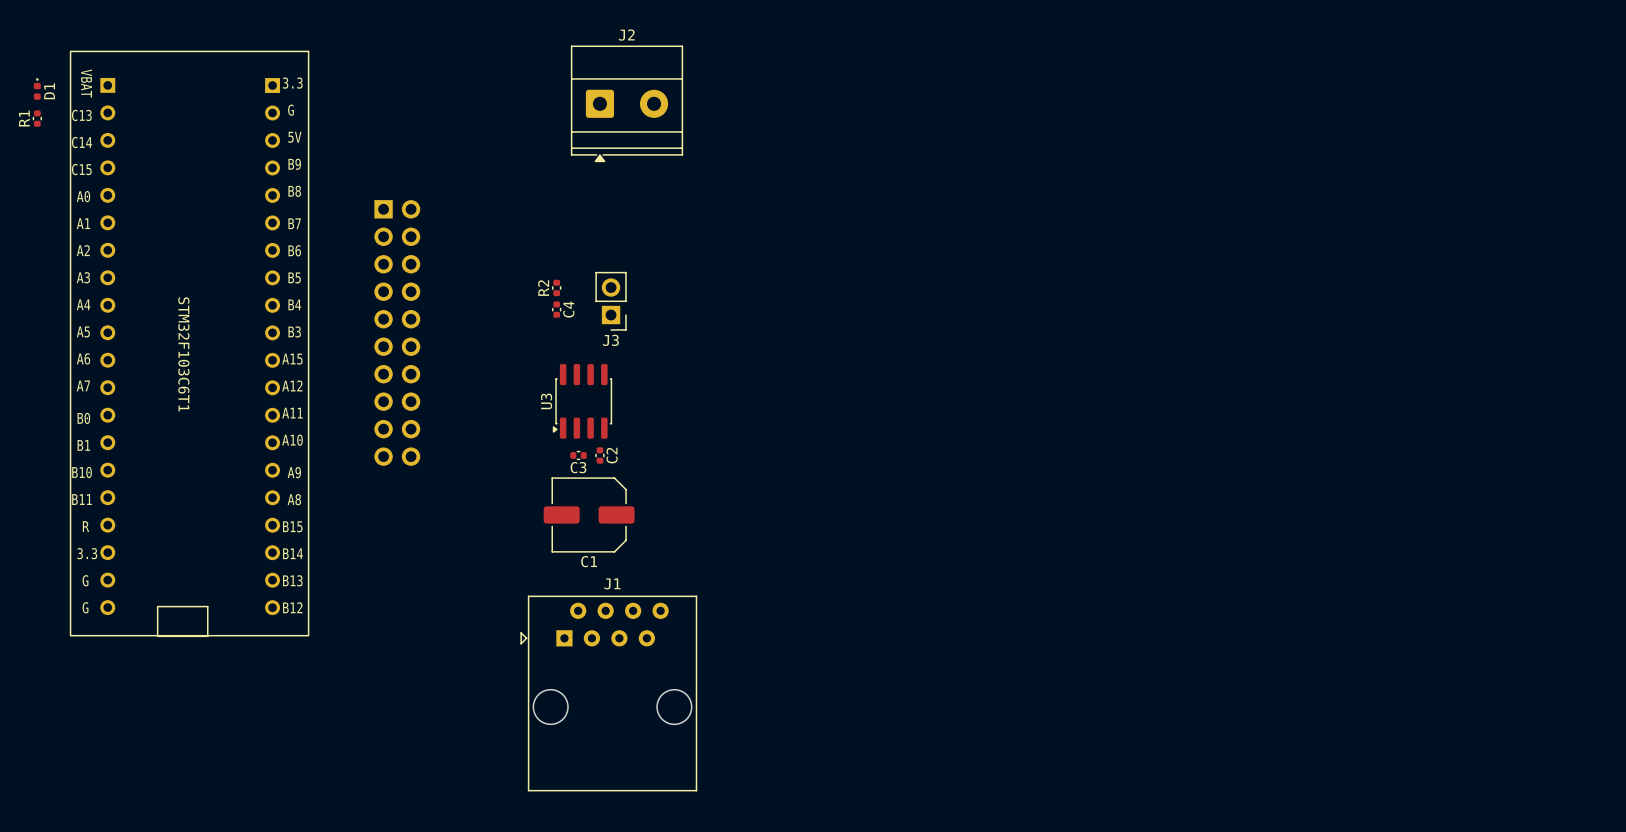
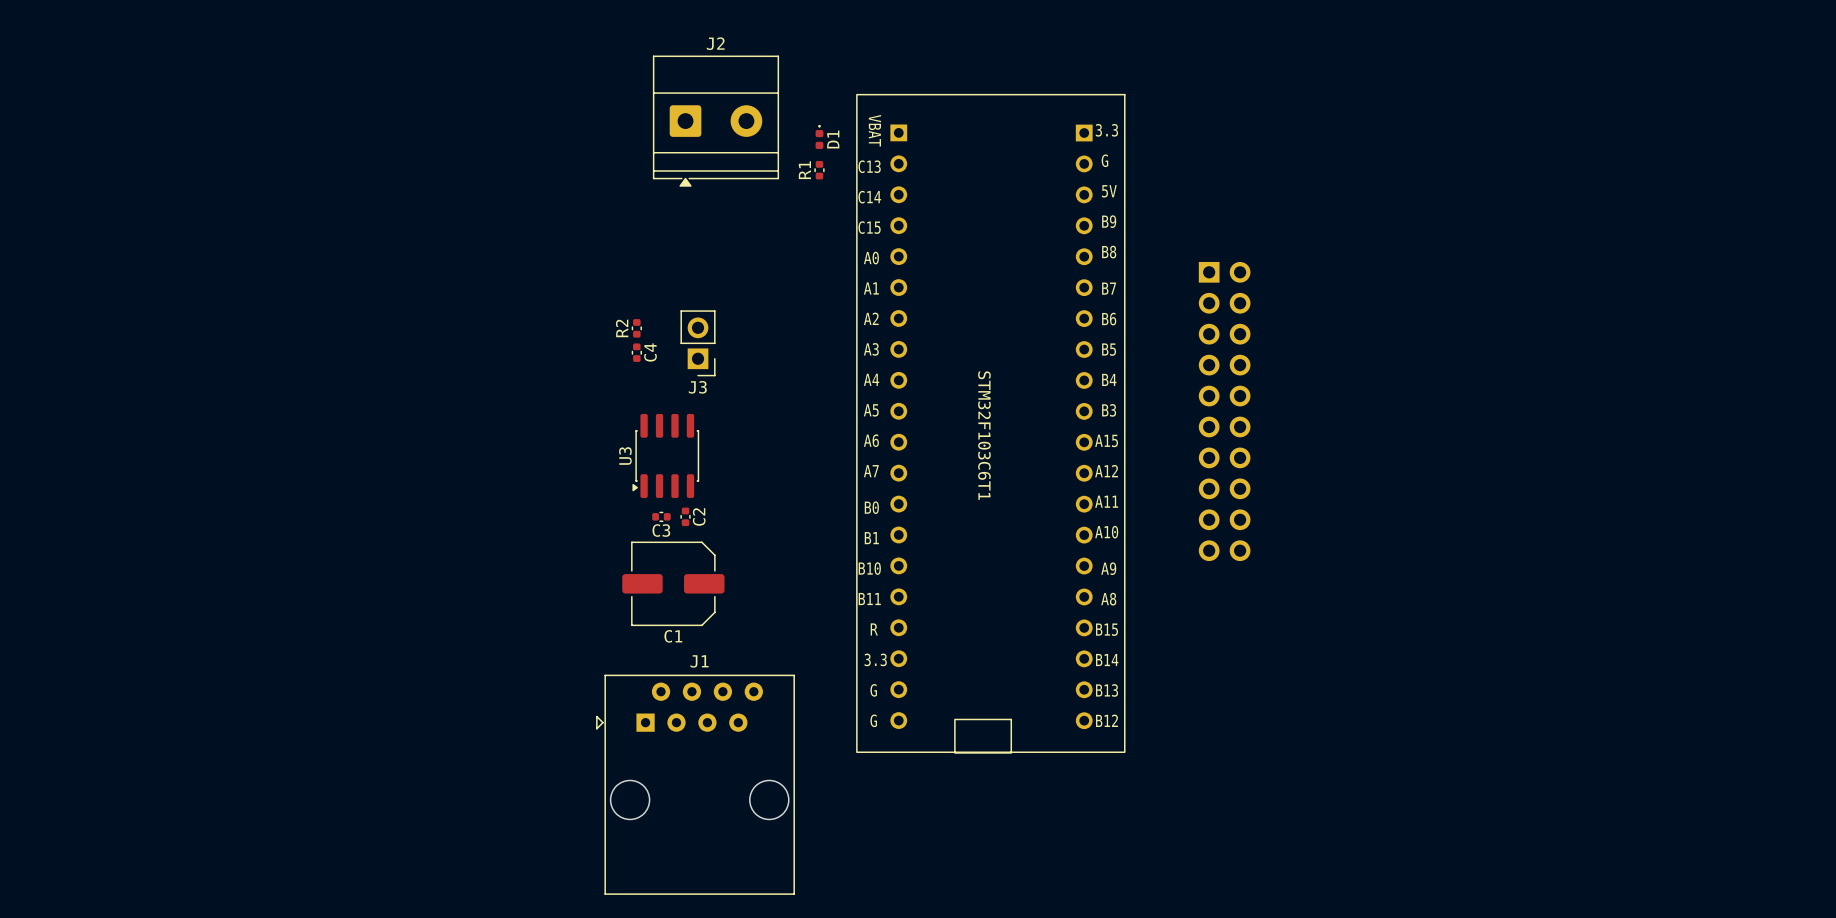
D1 position: (37, 89) -> (819, 137)
R1 position: (37, 118) -> (819, 170)
part: (397, 332) -> none
STM32F103C6T1 position: (189, 343) -> (990, 423)
part: none -> (1224, 411)

